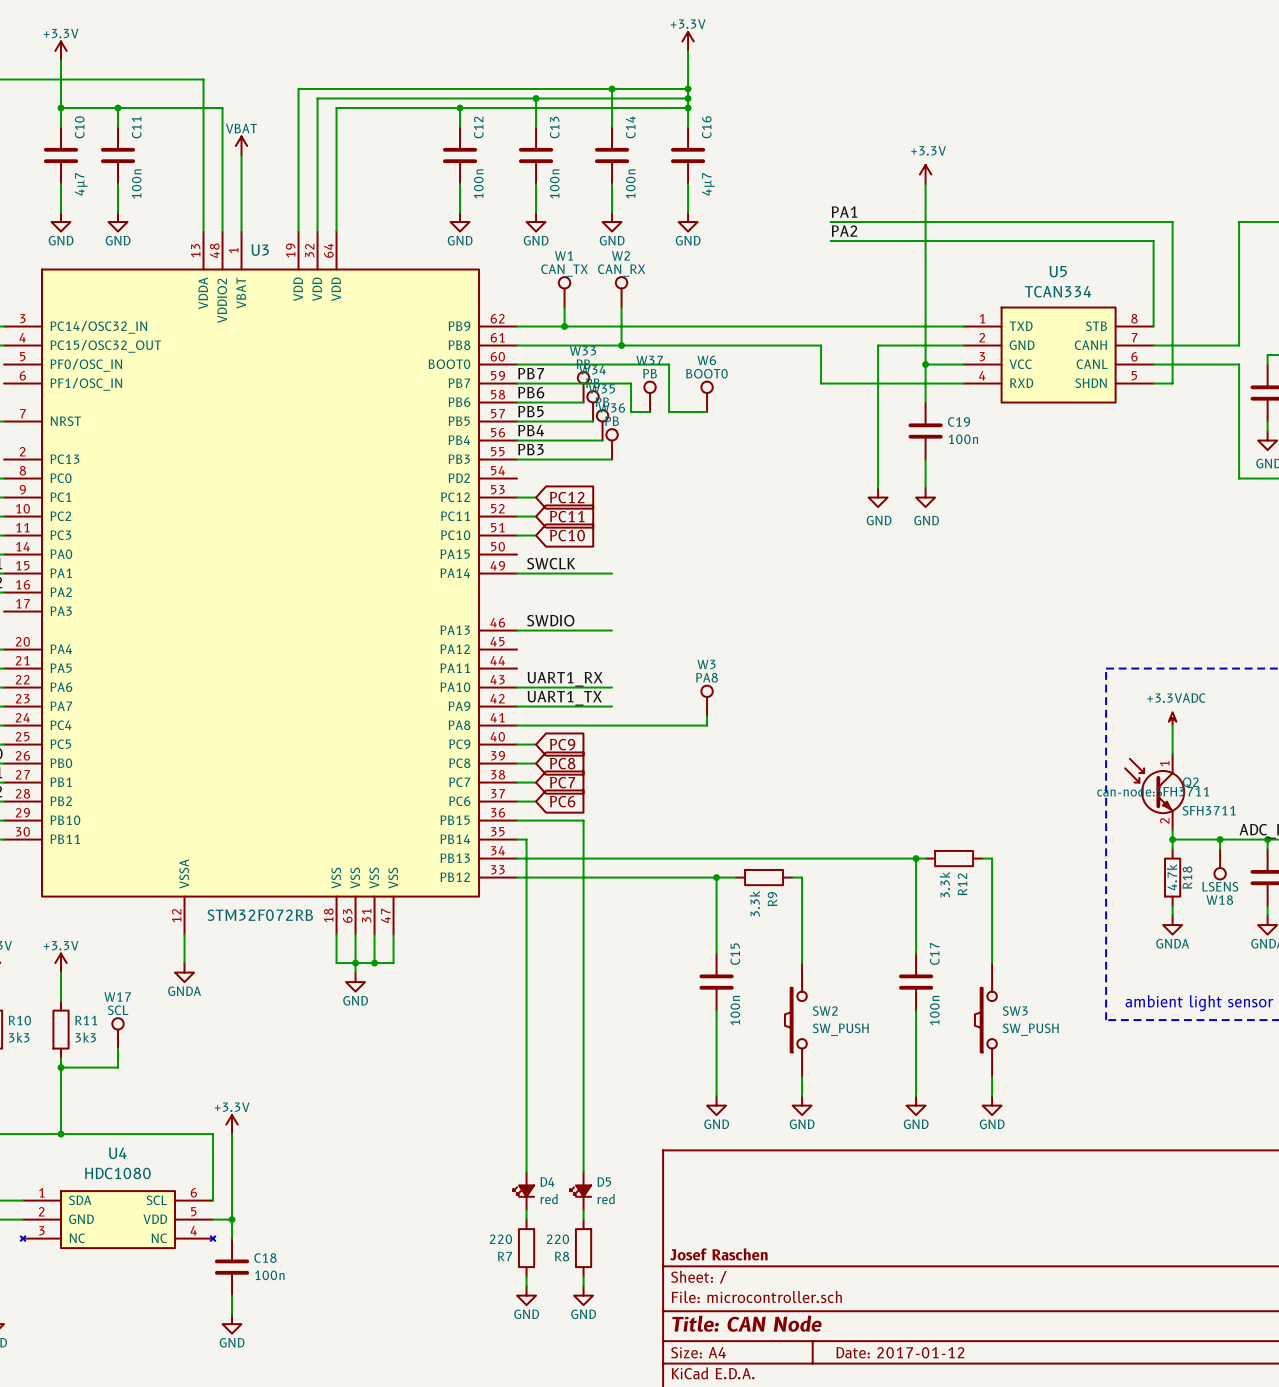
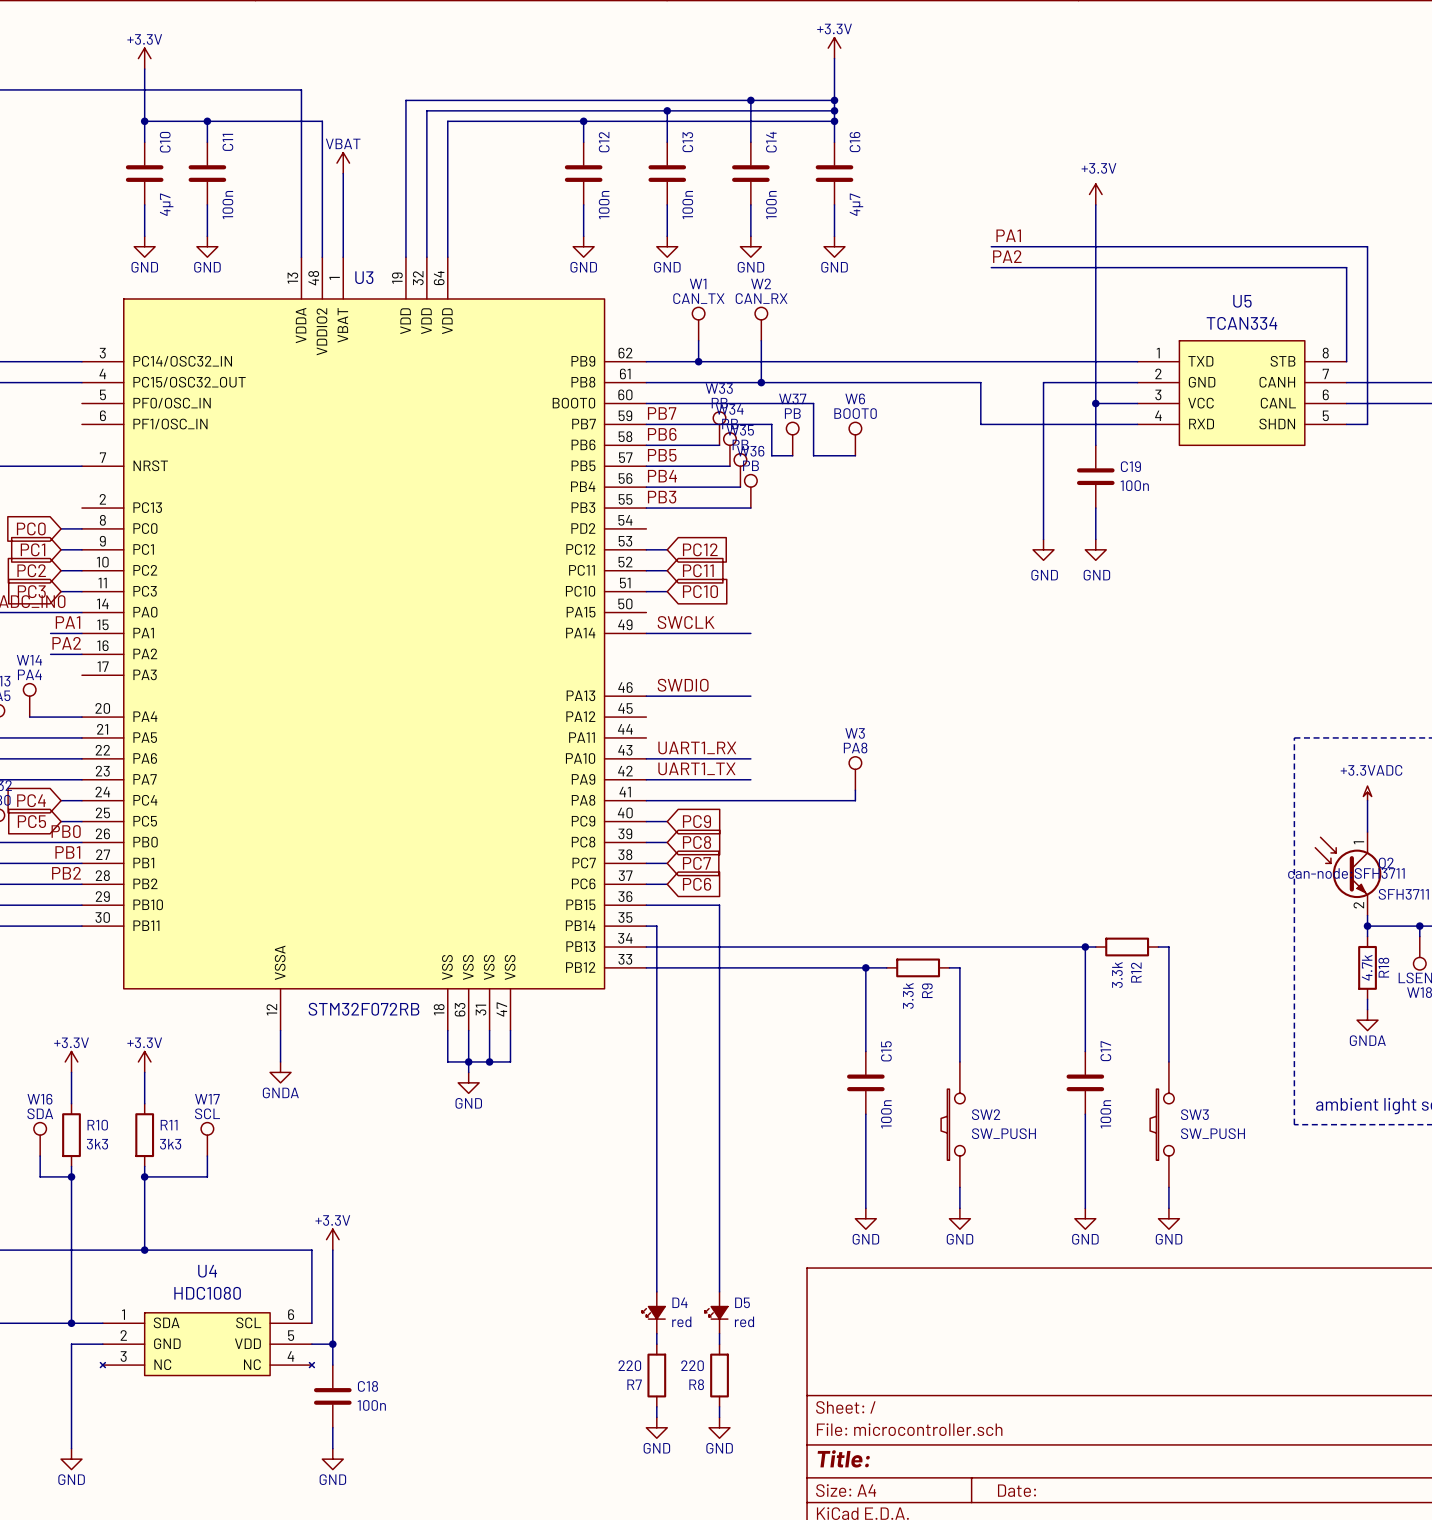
title block: Josef Raschen (718, 1254) -> none
title block: Title: CAN Node (746, 1323) -> Title: (843, 1458)
title block: Date: 2017-01-12 (900, 1352) -> Date: (1016, 1490)

